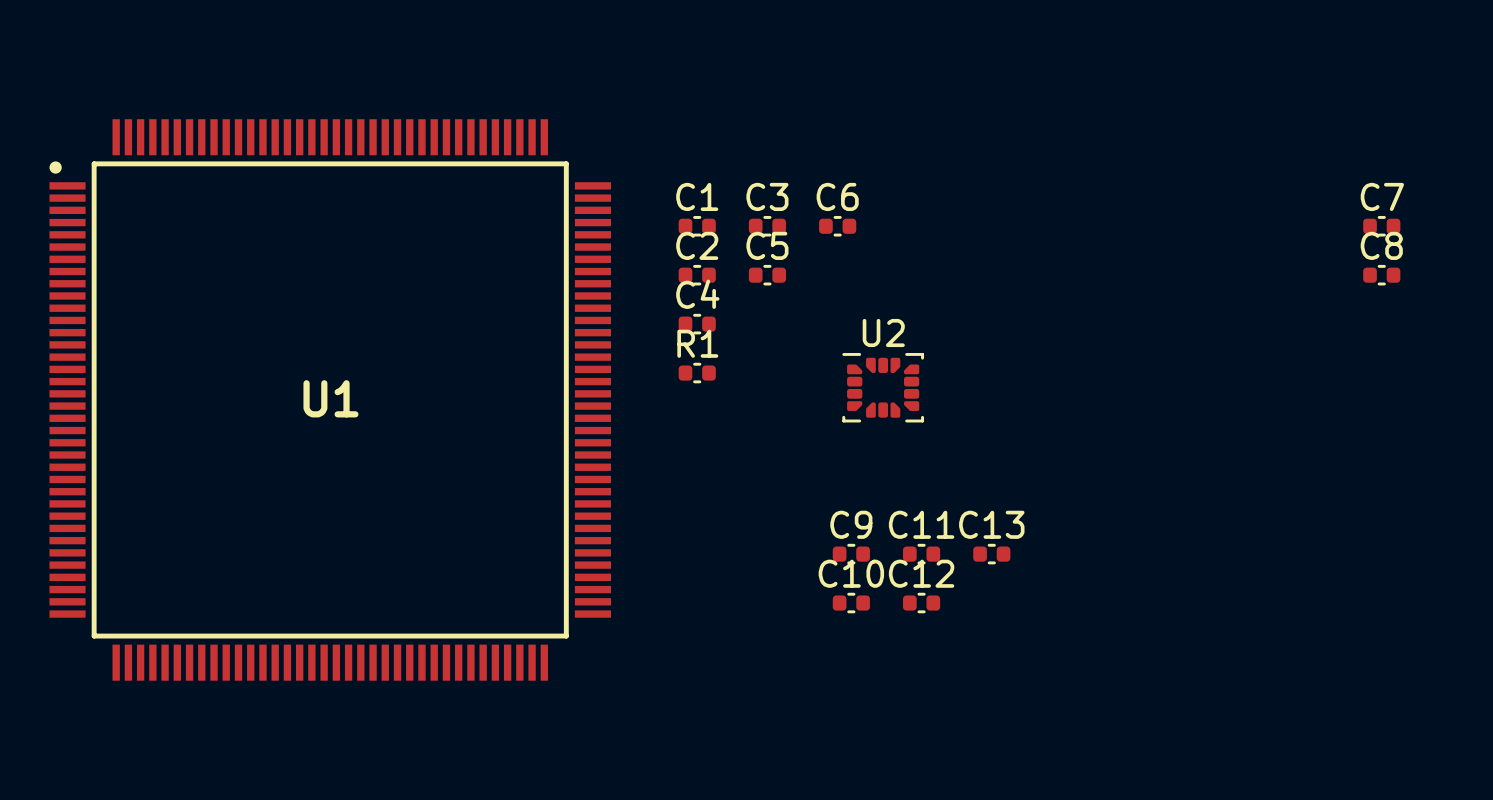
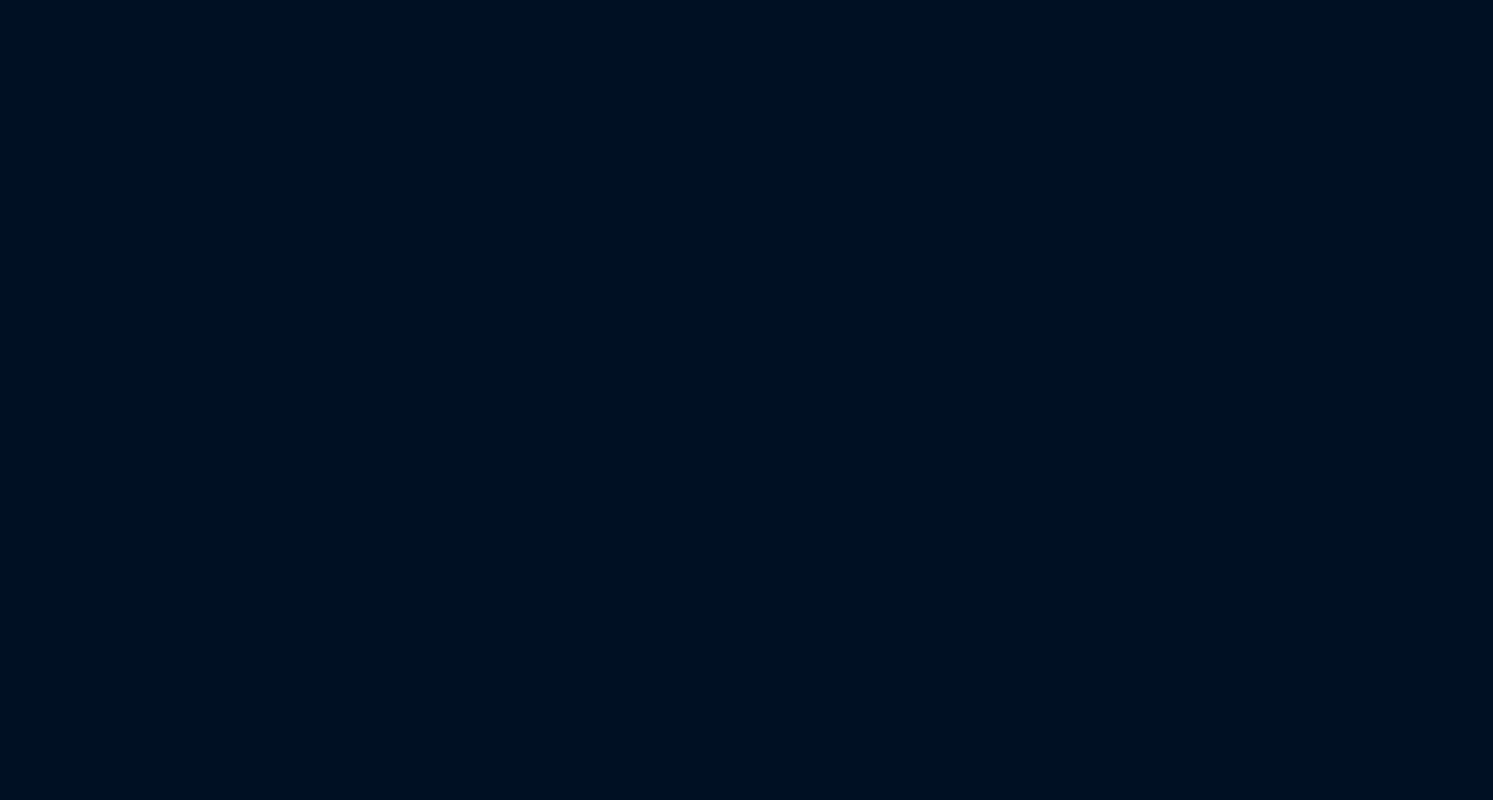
C1: (697, 226) -> none
C3: (767, 226) -> none
C6: (837, 226) -> none
C7: (1381, 226) -> none
C2: (697, 275) -> none
C5: (767, 275) -> none
C8: (1381, 275) -> none
C4: (697, 324) -> none
R1: (697, 373) -> none
U2: (883, 387) -> none
U1: (330, 399) -> none
C9: (851, 554) -> none
C11: (921, 554) -> none
C13: (991, 554) -> none
C10: (851, 603) -> none
C12: (921, 603) -> none

